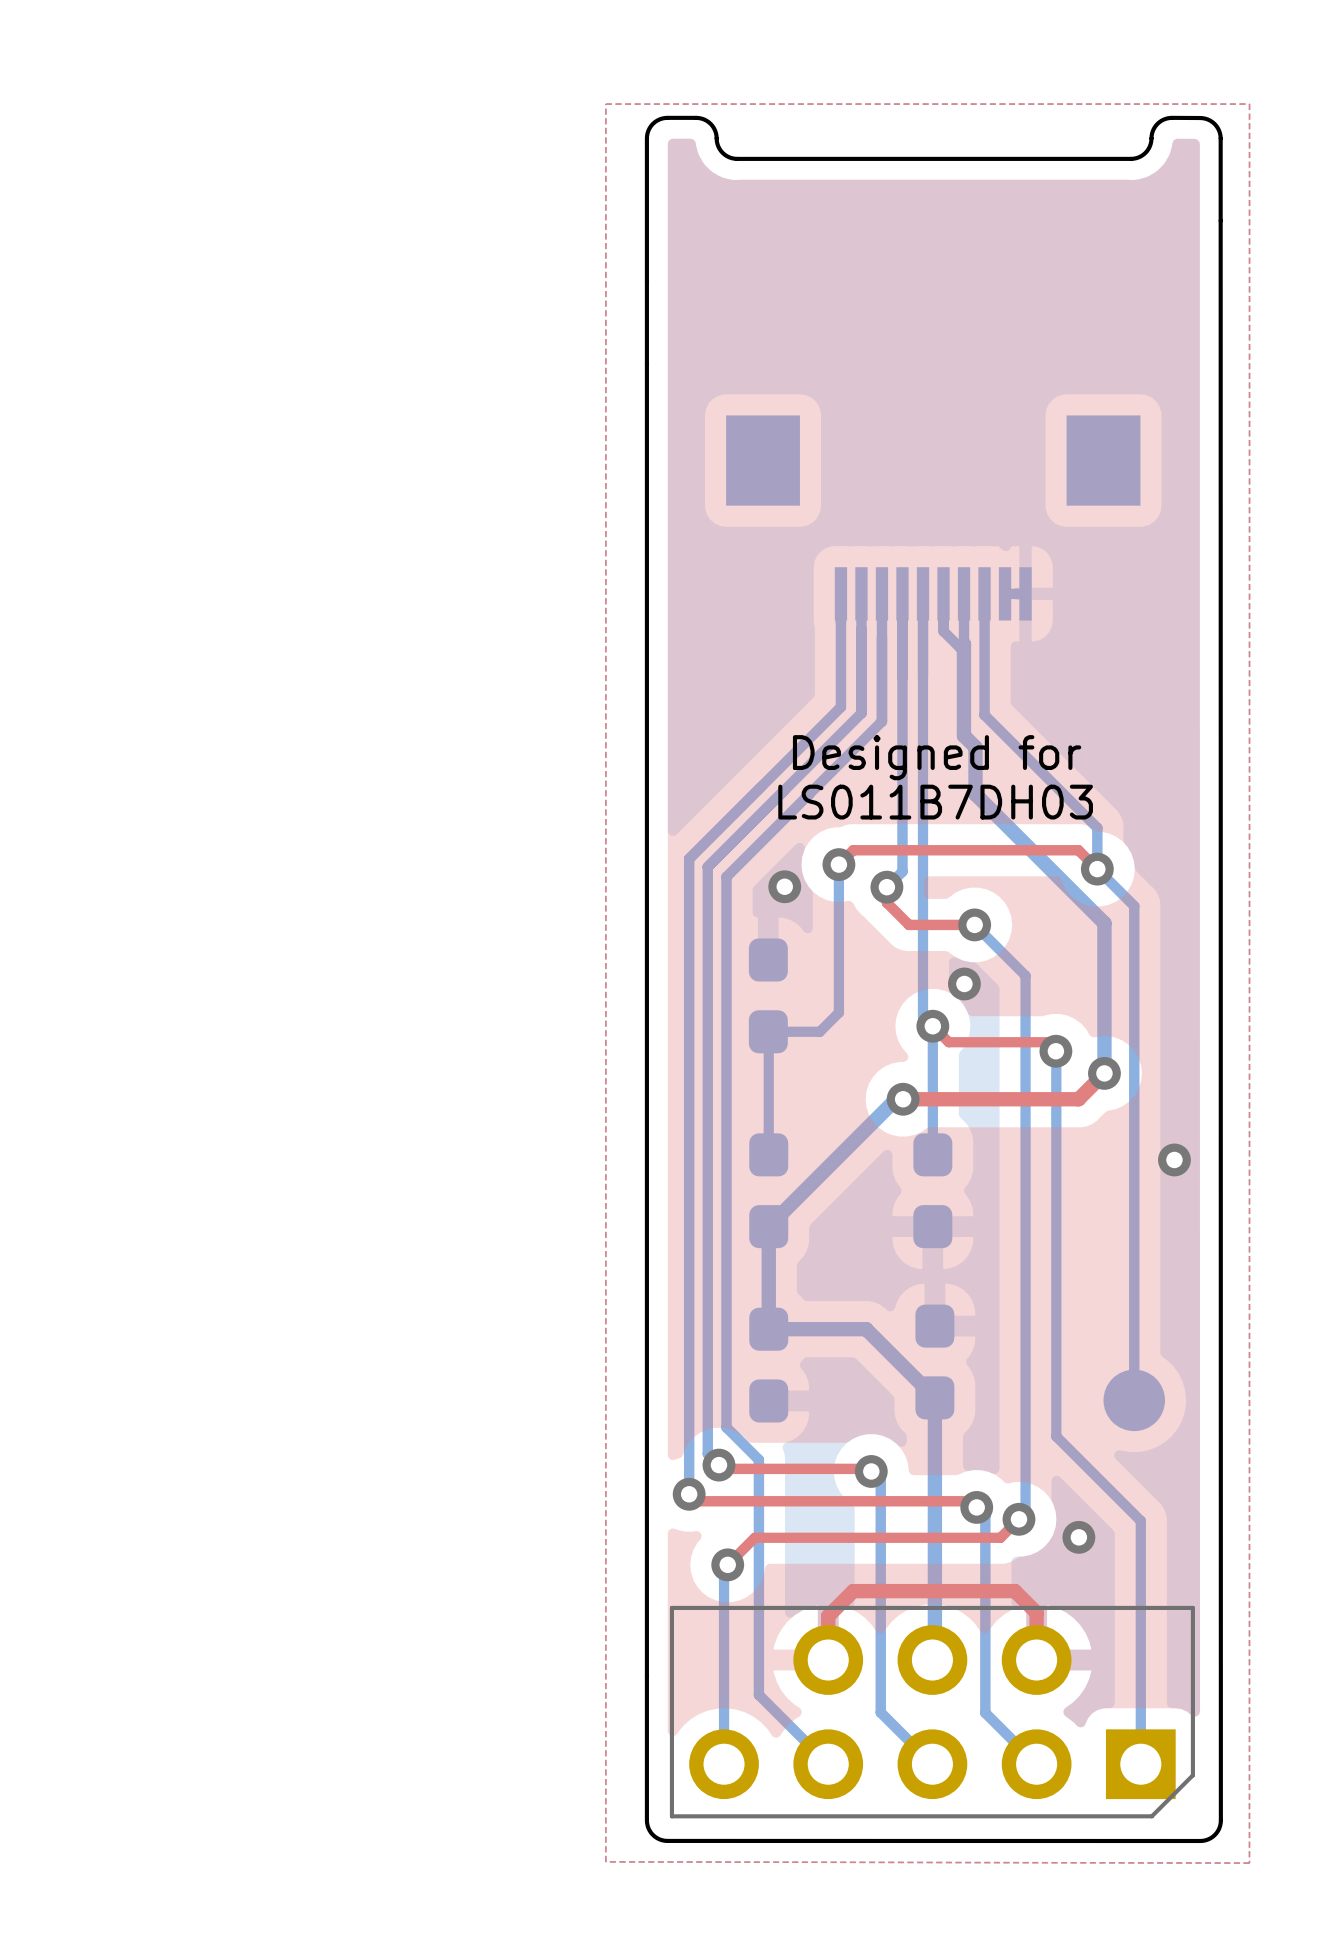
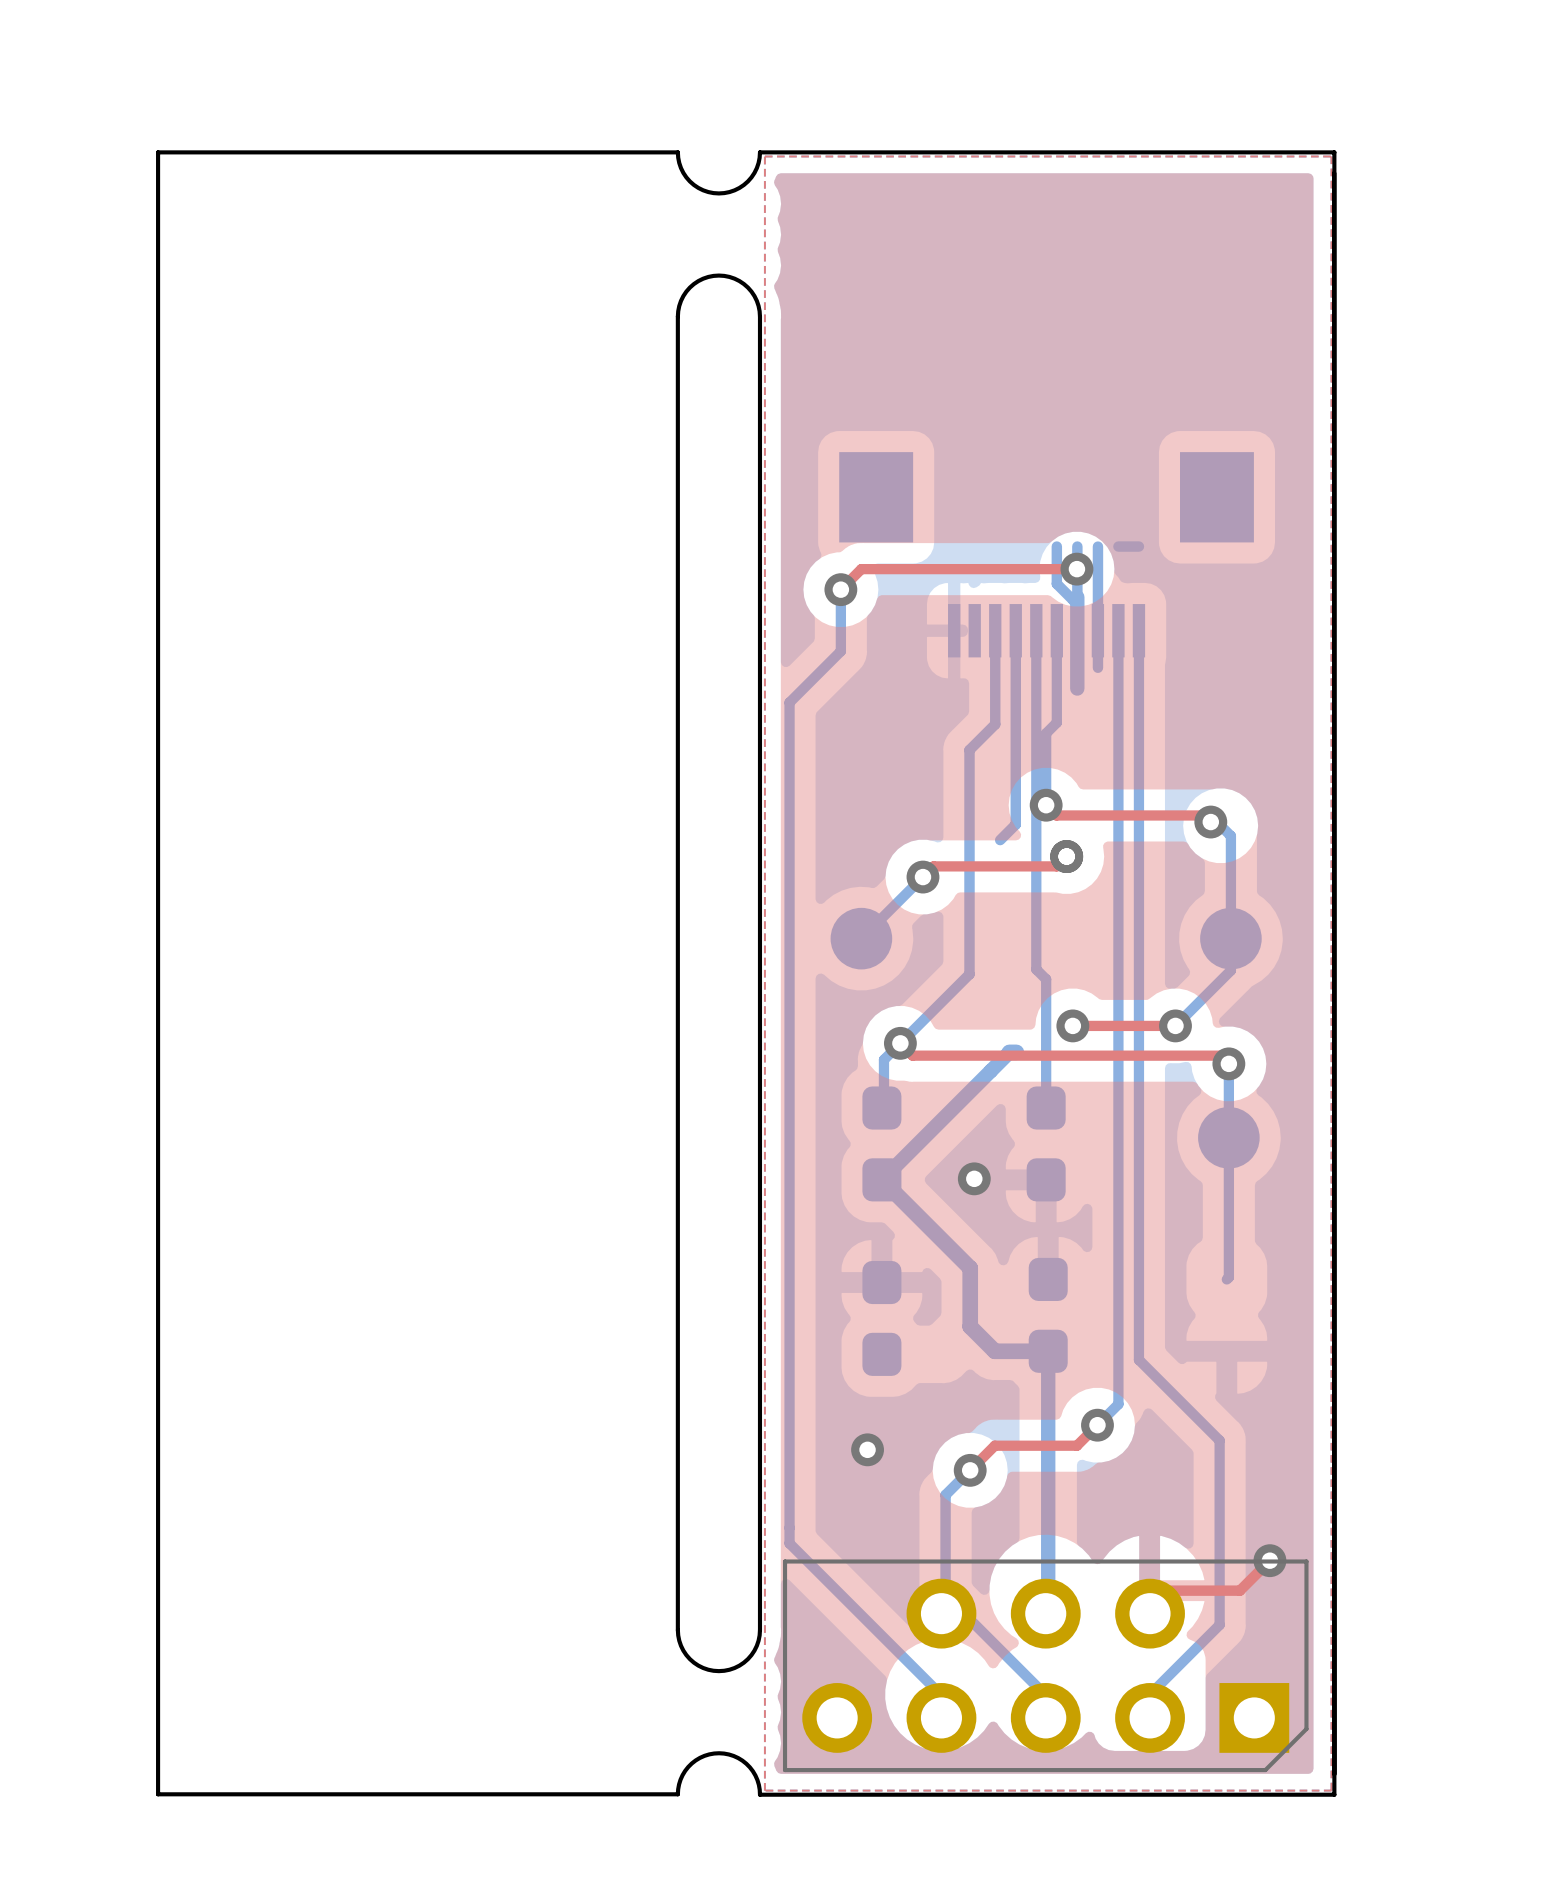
top zone outline: (605, 104) (605, 1861) (1249, 1863) (1249, 104) (605, 104) -> (764, 156) (764, 1790) (1331, 1790) (1331, 156) (764, 156)
board edge: (1220, 200) (1219, 133) (1214, 124) (1202, 118) (1172, 117) (1161, 120) (1153, 130) (1147, 150) (1141, 156) (1130, 158) (734, 158) (726, 156) (720, 150) (715, 130) (706, 120) (696, 117) (662, 118) (651, 125) (646, 138) (646, 364) -> (1334, 152) (759, 152) (756, 168) (747, 181) (734, 190) (718, 193) (703, 190) (689, 181) (680, 168) (677, 152) (158, 152) (158, 1794) (677, 1794) (680, 1779) (688, 1767) (704, 1755) (719, 1753) (733, 1756) (746, 1763) (757, 1780) (759, 1794) (1334, 1794) (1334, 173)
part position: (933, 517) -> (1046, 554)
bottom track: (840, 593) (840, 707) (689, 858) (689, 1494) -> none
bottom track: (861, 593) (861, 713) (707, 866) (707, 1453) (718, 1465) -> none
bottom track: (881, 593) (881, 677) -> none
bottom track: (902, 593) (902, 677) -> none
bottom track: (922, 593) (922, 677) -> none
top track: none -> (1076, 569) (861, 569) (840, 589)
via: none -> (1076, 569)
bottom track: none -> (840, 589) (840, 651) (789, 702) (789, 1543) (941, 1694)
via: none -> (840, 589)
bottom track: none -> (1056, 630) (1056, 722) (1046, 733) (1046, 805)
bottom track: none -> (1118, 630) (1118, 1404) (1097, 1425)
bottom track: (984, 715) (1097, 827) (1097, 869) (1134, 906) (1134, 1400) -> none
bottom track: (881, 721) (726, 876) (726, 1427) (758, 1459) (758, 1694) (828, 1764) -> (995, 674) (995, 724) (969, 750) (969, 974) (883, 1059) (883, 1105)
bottom track: (963, 735) (975, 747) (975, 794) (1104, 923) (1104, 1073) -> none
text: Designed for (937, 757) -> none
text: LS011B7DH03 (935, 802) -> none
top track: none -> (1046, 805) (1056, 815) (1210, 815) (1220, 825)
via: none -> (1046, 805)
bottom track: (840, 862) (838, 864) (838, 1012) (819, 1031) (768, 1031) -> none
top track: (838, 864) (853, 850) (1078, 850) (1097, 869) -> none
via: (838, 864) -> none
bottom track: none -> (1220, 825) (1230, 836) (1230, 970) (1175, 1025)
via: (784, 886) -> none
top track: (886, 887) (886, 902) (909, 924) (974, 924) -> none
via: (886, 887) -> none
top track: none -> (1066, 856) (1056, 866) (933, 866) (922, 877)
bottom track: none -> (922, 877) (861, 938)
via: none -> (922, 877)
bottom track: (974, 924) (1025, 975) -> (1138, 630) (1138, 928)
via position: (974, 924) -> (1066, 856)
part footprint: [748, 938, 788, 1054] -> [830, 907, 893, 970]
via: (964, 983) -> none
part: none -> (1230, 938)
top track: (932, 1026) (948, 1042) (1046, 1042) (1055, 1051) -> none
via: (932, 1026) -> none
bottom track: (768, 1032) (768, 1154) -> none
via position: (1055, 1051) -> (1175, 1025)
bottom track: (1056, 1051) (1056, 1436) (1140, 1520) (1140, 1764) -> none
top track: none -> (1072, 1025) (1175, 1025)
via: none -> (1072, 1025)
top track: (1104, 1073) (1078, 1099) (903, 1099) -> none
via: (1104, 1073) -> none
top track: none -> (900, 1043) (912, 1055) (1220, 1055) (1228, 1063)
via: none -> (900, 1043)
via: (903, 1099) -> none
bottom track: none -> (1228, 1063) (1228, 1277) (1226, 1279)
via: none -> (1228, 1063)
via: (1174, 1159) -> none
part: none -> (1228, 1137)
via: none -> (974, 1178)
bottom track: (768, 1226) (768, 1329) (866, 1329) (934, 1397) -> (881, 1179) (970, 1268) (970, 1326) (994, 1351) (1048, 1351)
part: (1134, 1400) -> none
bottom track: (1025, 1406) (1025, 1512) (1018, 1519) -> (1138, 1359) (1219, 1440) (1219, 1624) (1149, 1694)
top track: (718, 1465) (722, 1468) (868, 1468) (871, 1471) -> none
via: (718, 1465) -> none
bottom track: (871, 1471) (880, 1480) (880, 1712) (932, 1764) -> none
via position: (871, 1471) -> (970, 1470)
top track: none -> (1097, 1425) (1076, 1445) (994, 1445) (970, 1470)
via: none -> (1097, 1425)
top track: (689, 1494) (696, 1501) (970, 1501) (976, 1507) -> none
via: (689, 1494) -> none
via: none -> (867, 1449)
bottom track: (976, 1507) (985, 1516) (985, 1712) (1036, 1764) -> none
via: (976, 1507) -> none
bottom track: none -> (970, 1470) (945, 1494) (945, 1595) (1045, 1694)
top track: (1018, 1519) (1000, 1537) (754, 1537) (727, 1564) -> none
via: (1018, 1519) -> none
via: (1078, 1537) -> none
bottom track: (727, 1564) (724, 1568) (724, 1764) -> none
via: (727, 1564) -> none
top track: none -> (1269, 1560) (1239, 1590) (1149, 1590)
via: none -> (1269, 1560)
top track: (828, 1660) (828, 1616) (853, 1591) (1014, 1591) (1036, 1612) (1036, 1660) -> none
board edge: (646, 1676) (647, 1823) (651, 1832) (662, 1840) (1200, 1840) (1208, 1839) (1214, 1834) (1219, 1828) (1220, 1820) -> (759, 1630) (756, 1645) (747, 1659) (734, 1668) (718, 1671) (703, 1668) (689, 1659) (680, 1645) (677, 1630) (677, 316) (680, 300) (689, 287) (703, 278) (718, 275) (734, 278) (747, 287) (756, 300) (759, 316)

